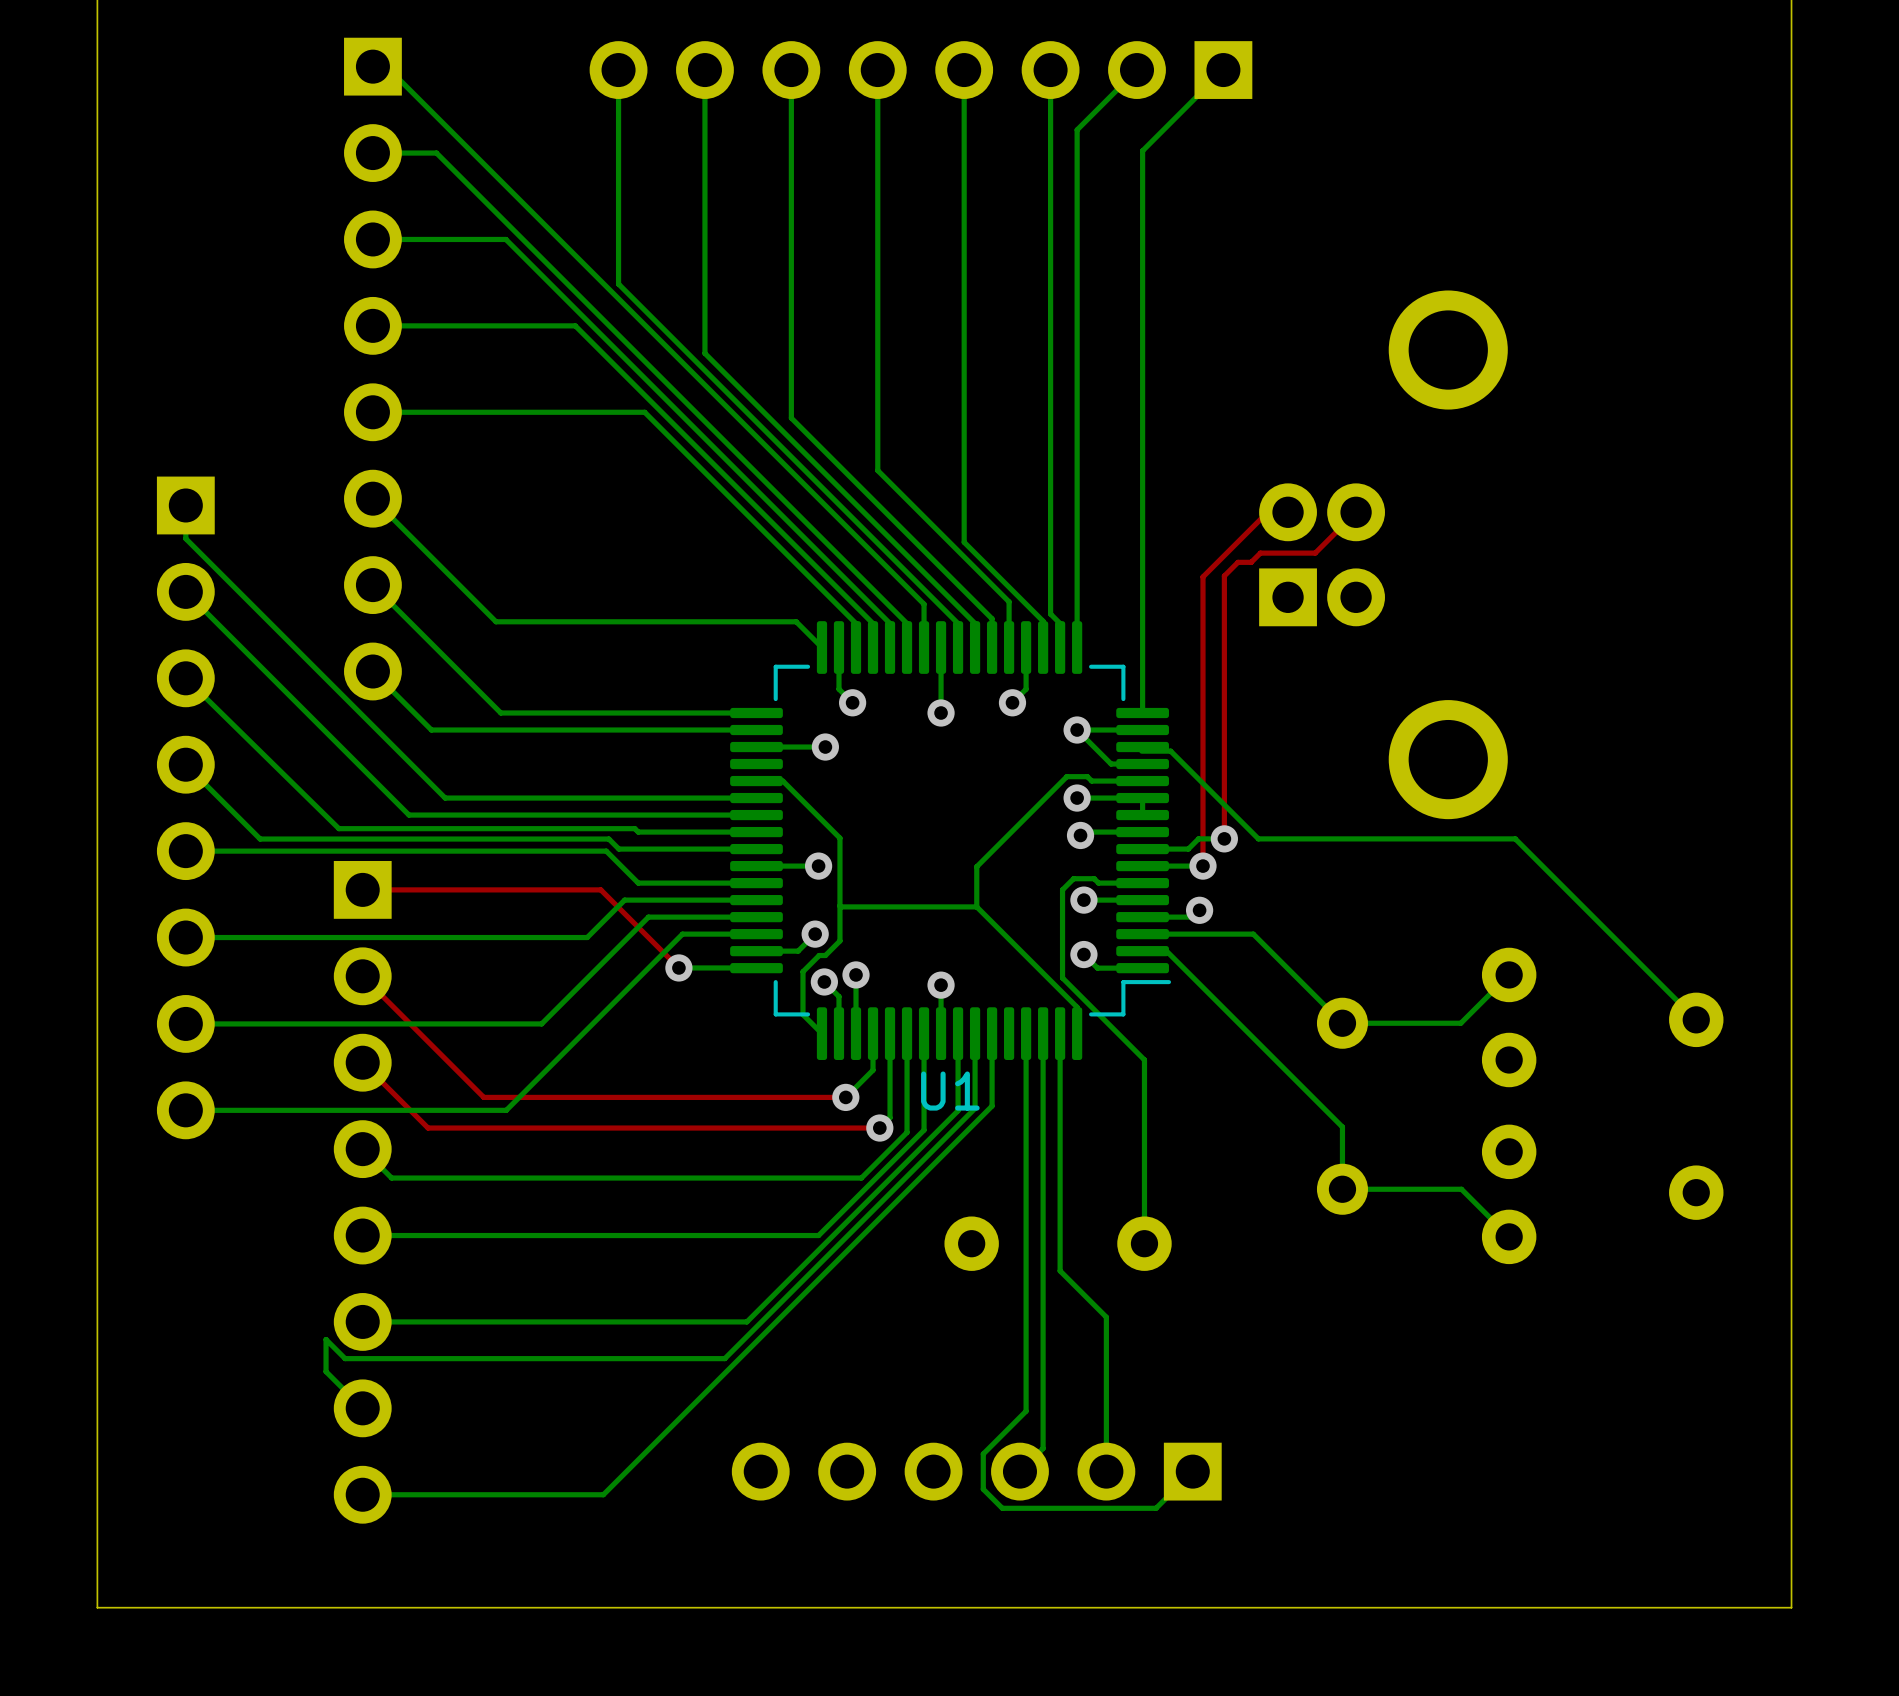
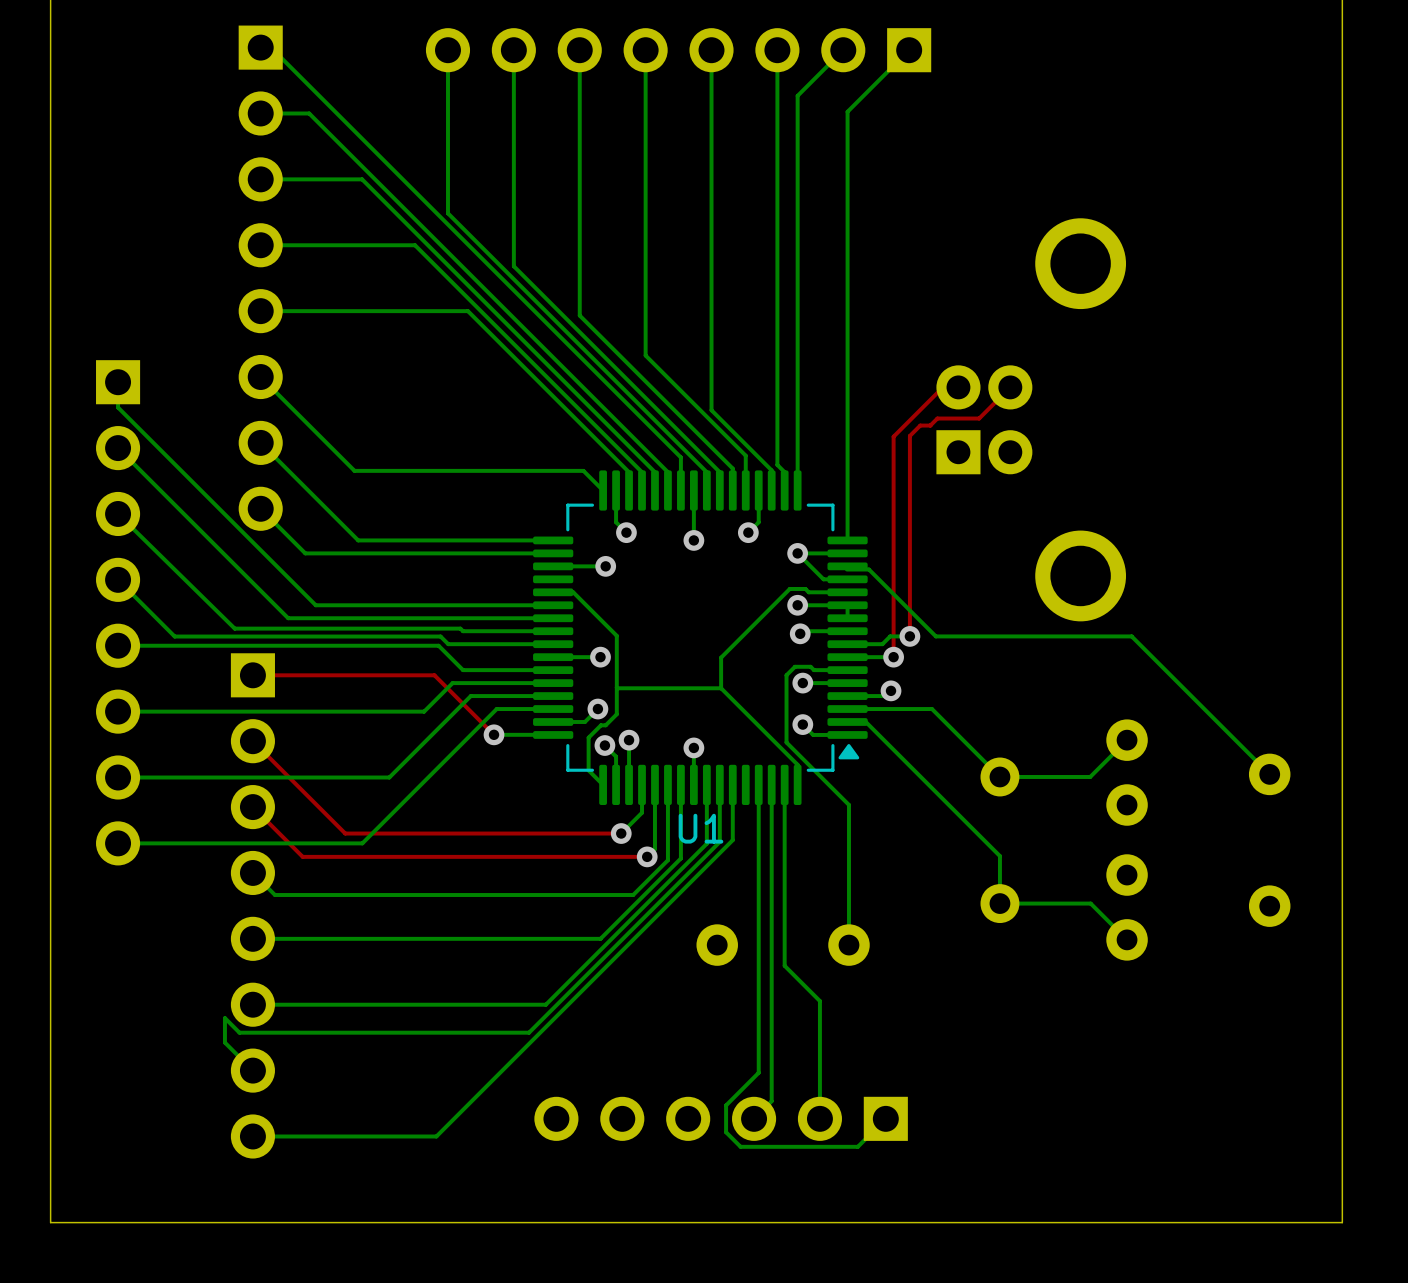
U1 footprint: [730, 621, 1172, 1060] -> [533, 470, 868, 806]

